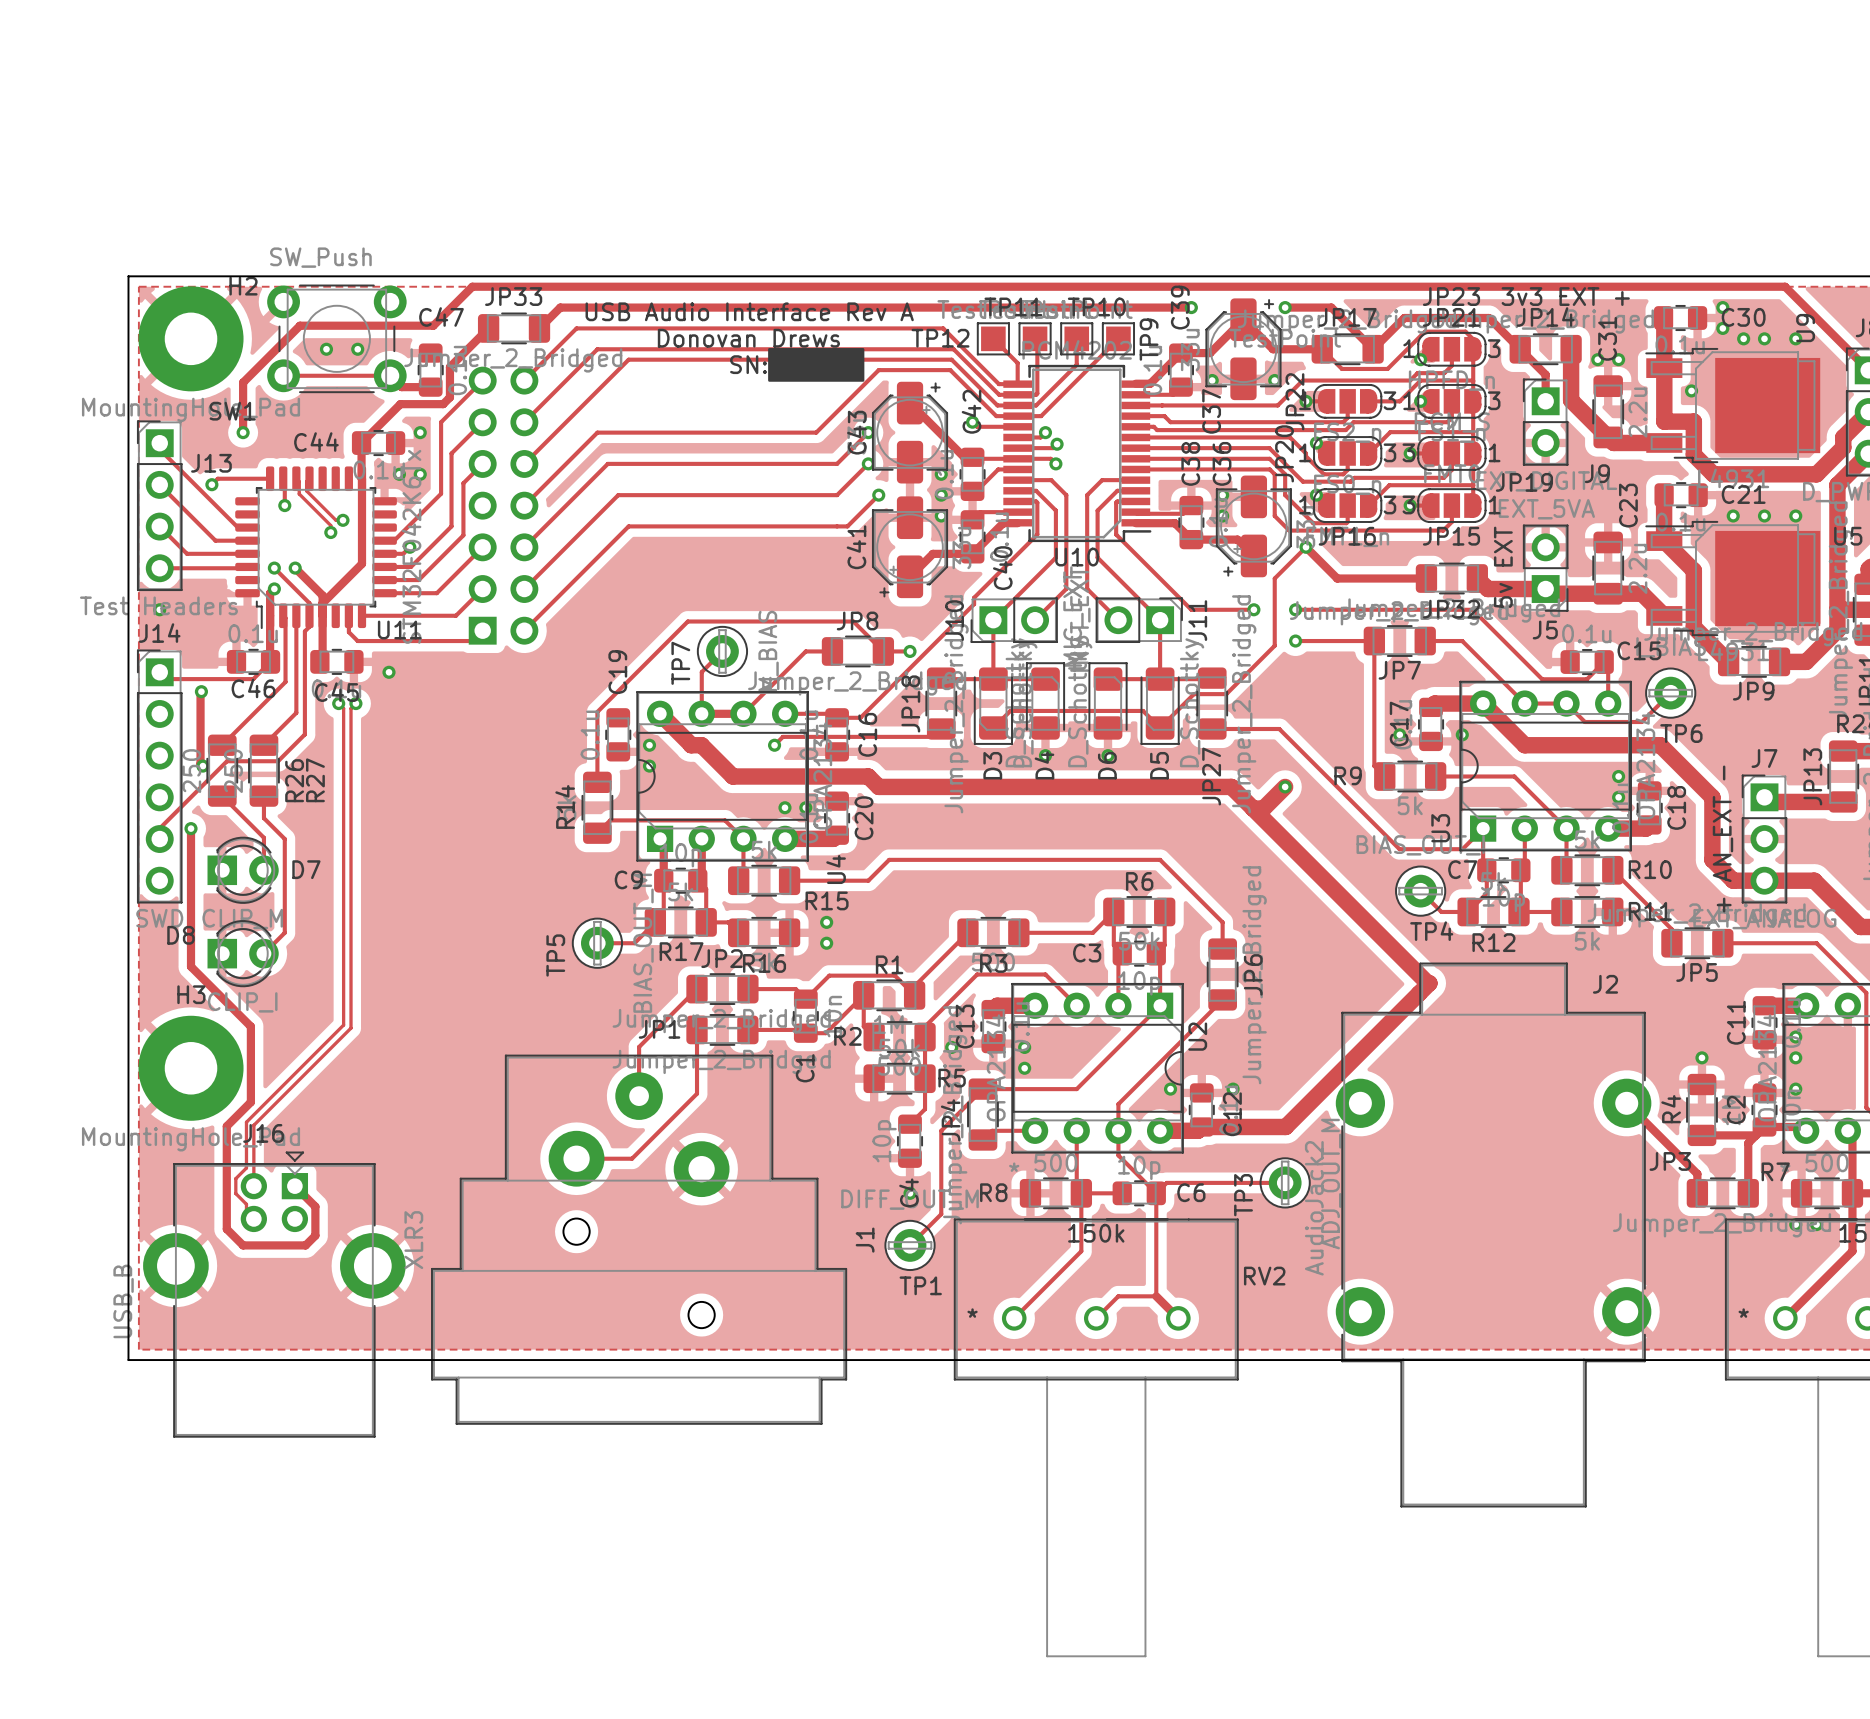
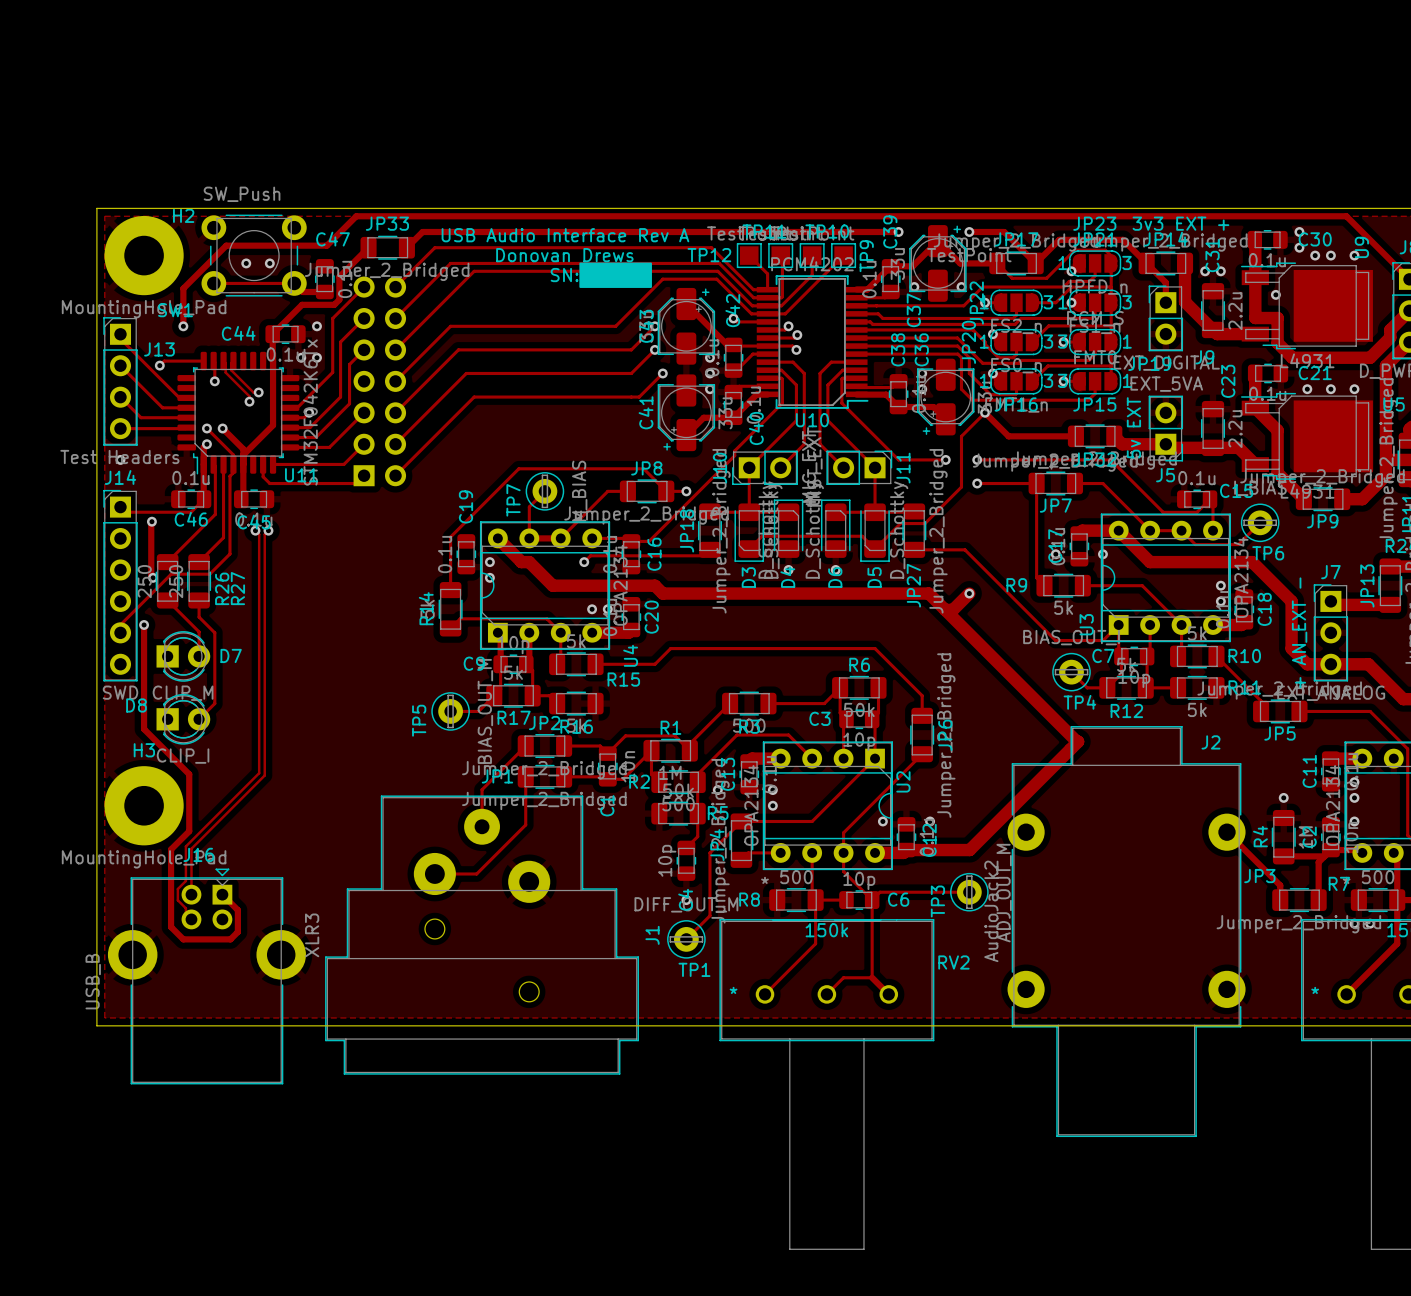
via: (389, 672) -> none
via: (826, 922) -> none
via: (826, 943) -> none

